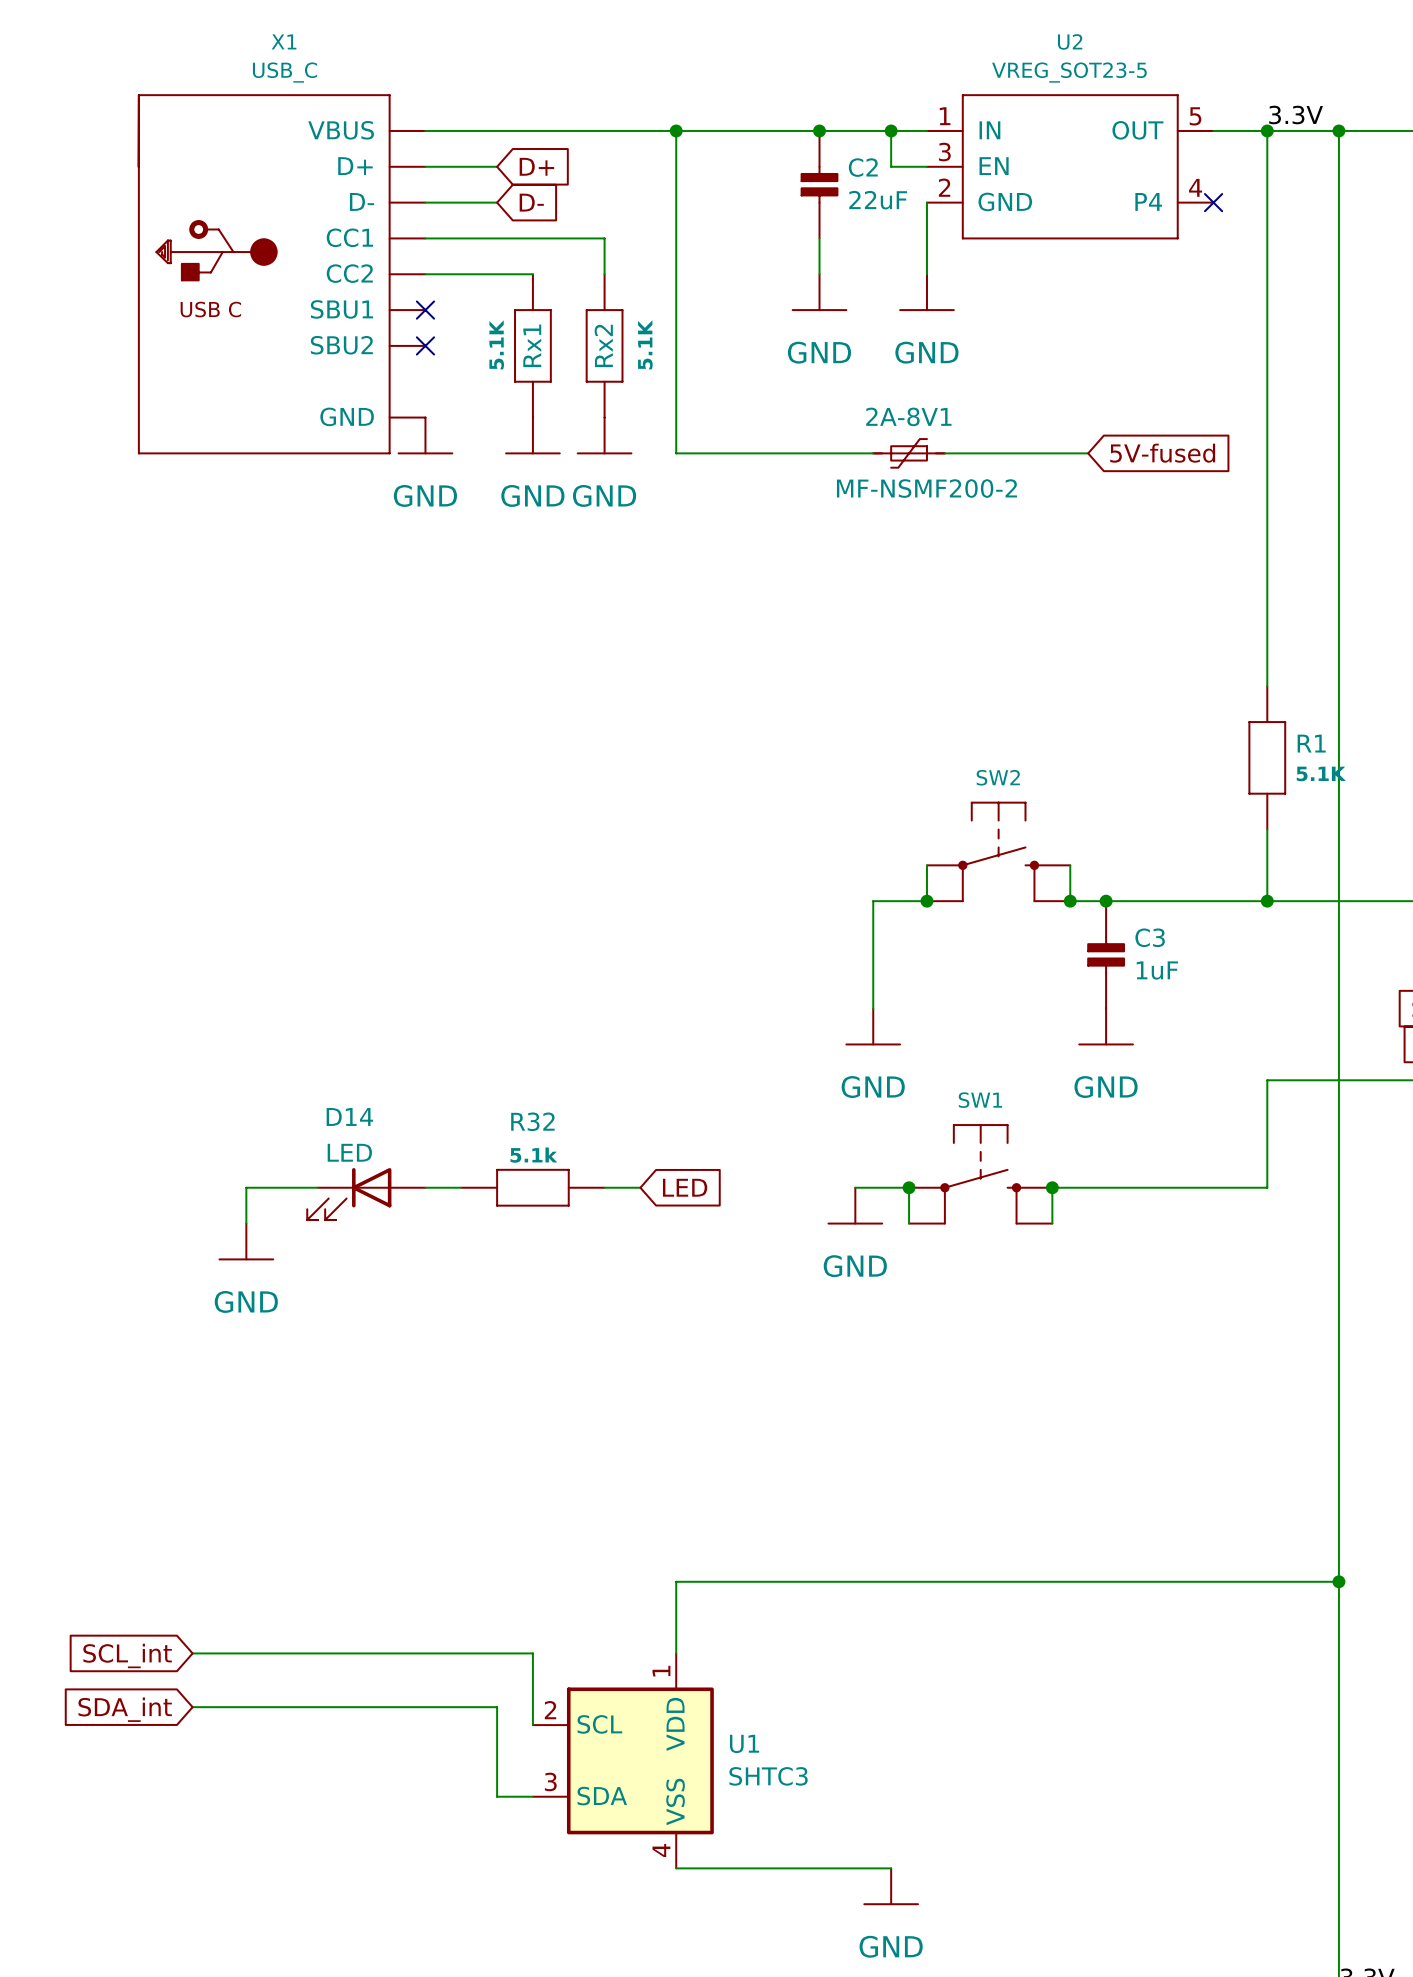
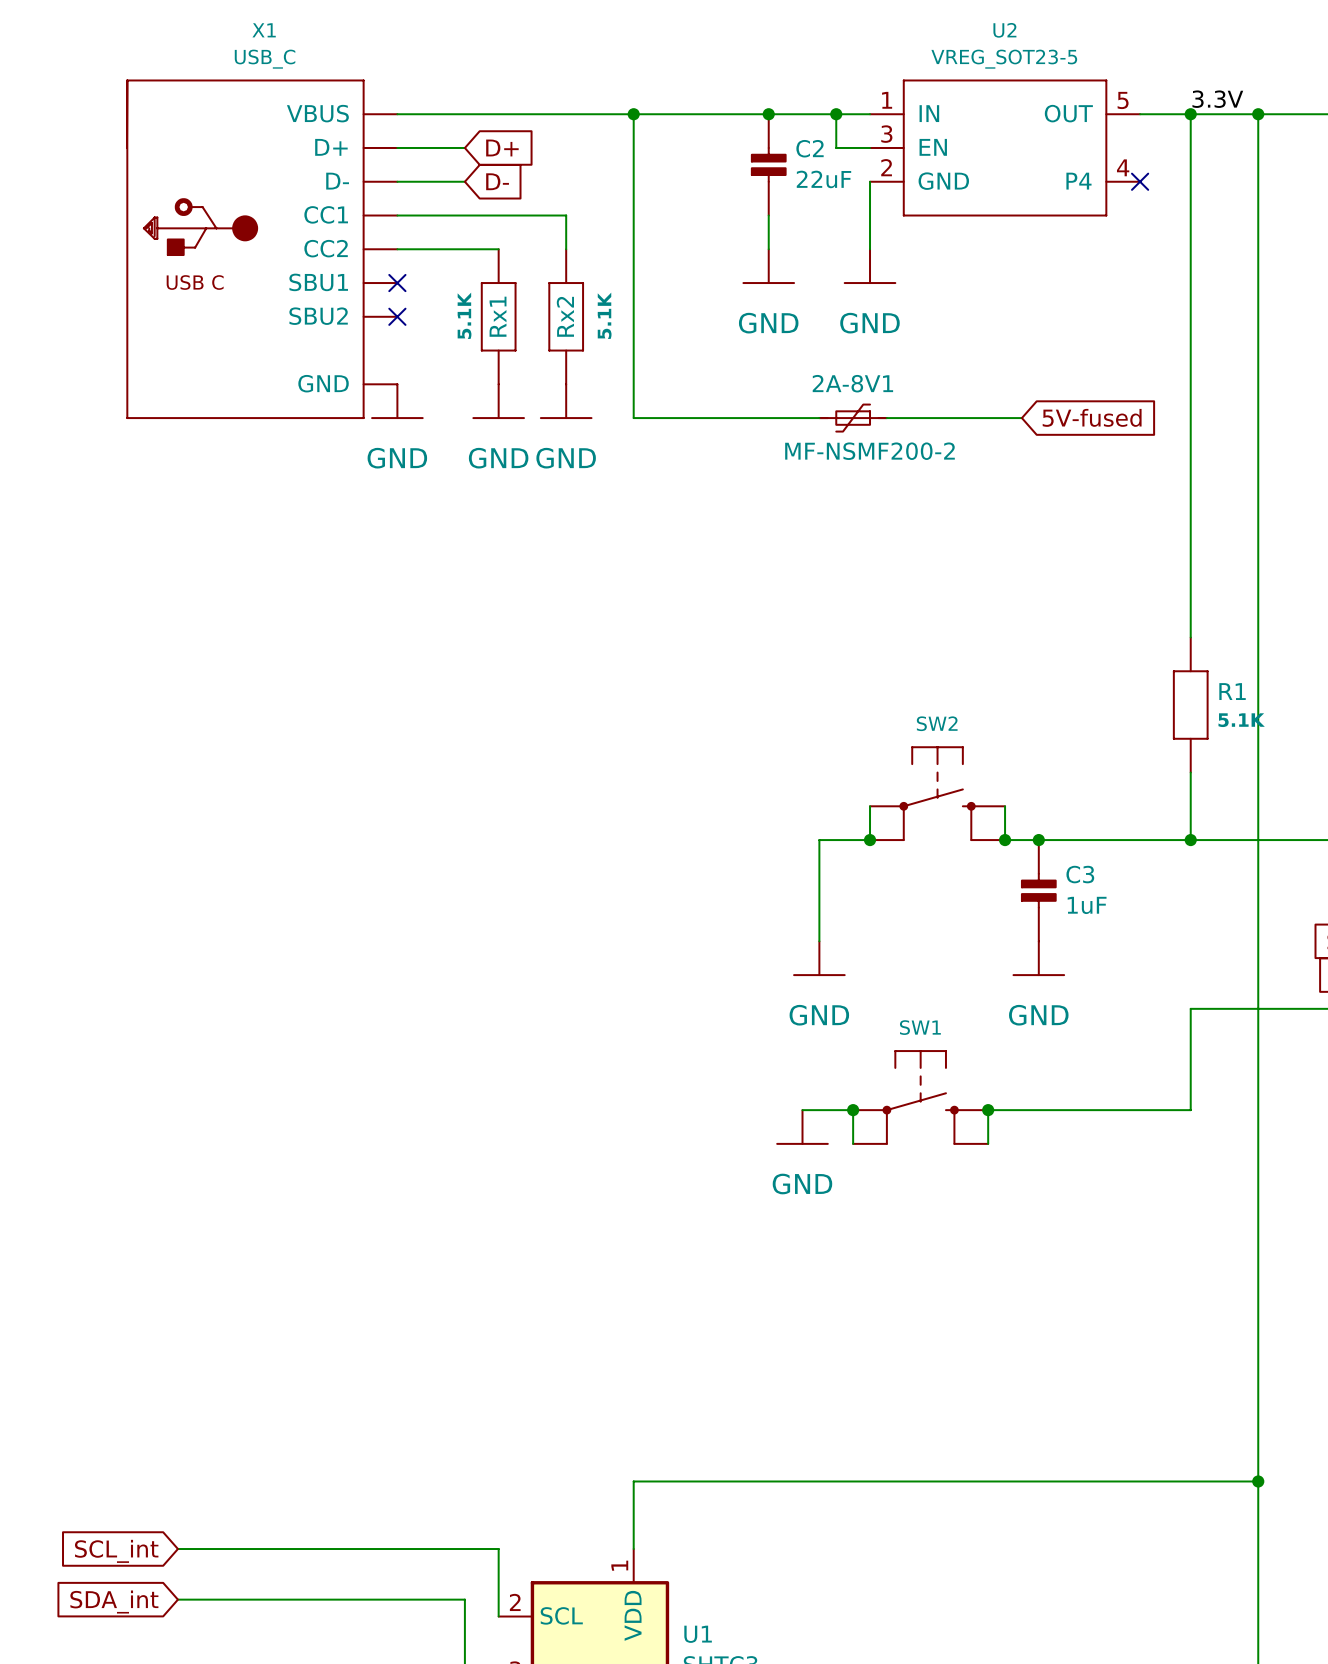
wire: (317, 1187) (246, 1187) (246, 1223) -> none
wire: (425, 1187) (461, 1187) -> none
R32: 5.1k (532, 1187) -> none
wire: (604, 1187) (640, 1187) -> none
global label: LED (685, 1187) -> none
D14: LED (366, 1194) -> none
power symbol: GND (246, 1241) -> none

